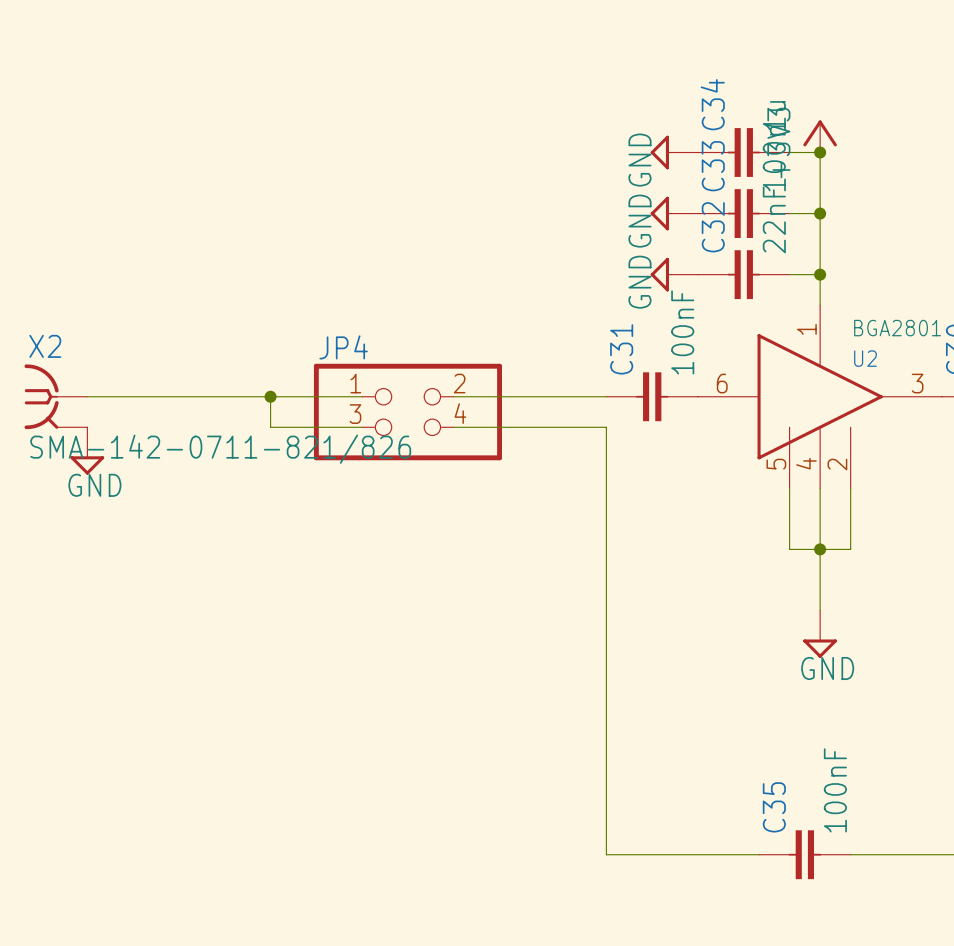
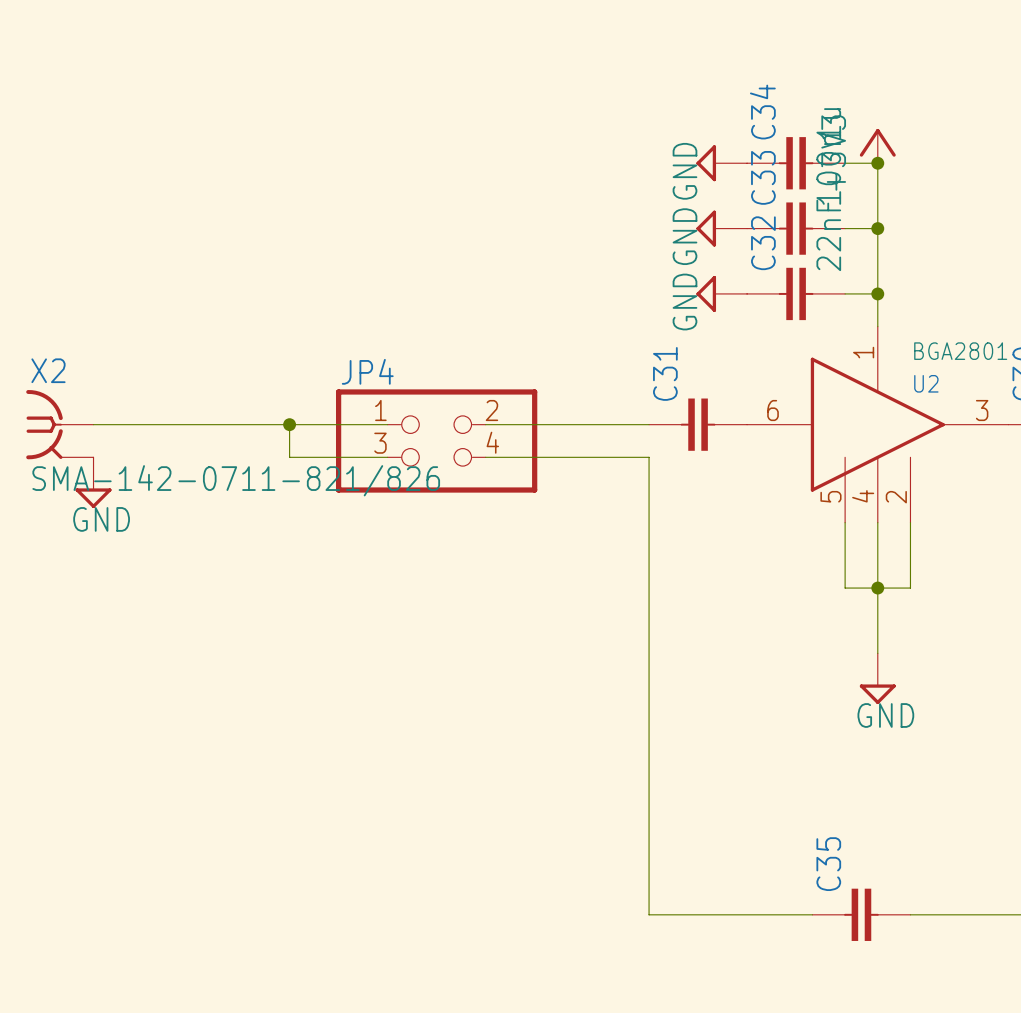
C31 value: 100nF (682, 332) -> none
C35 value: 100nF (835, 790) -> none

